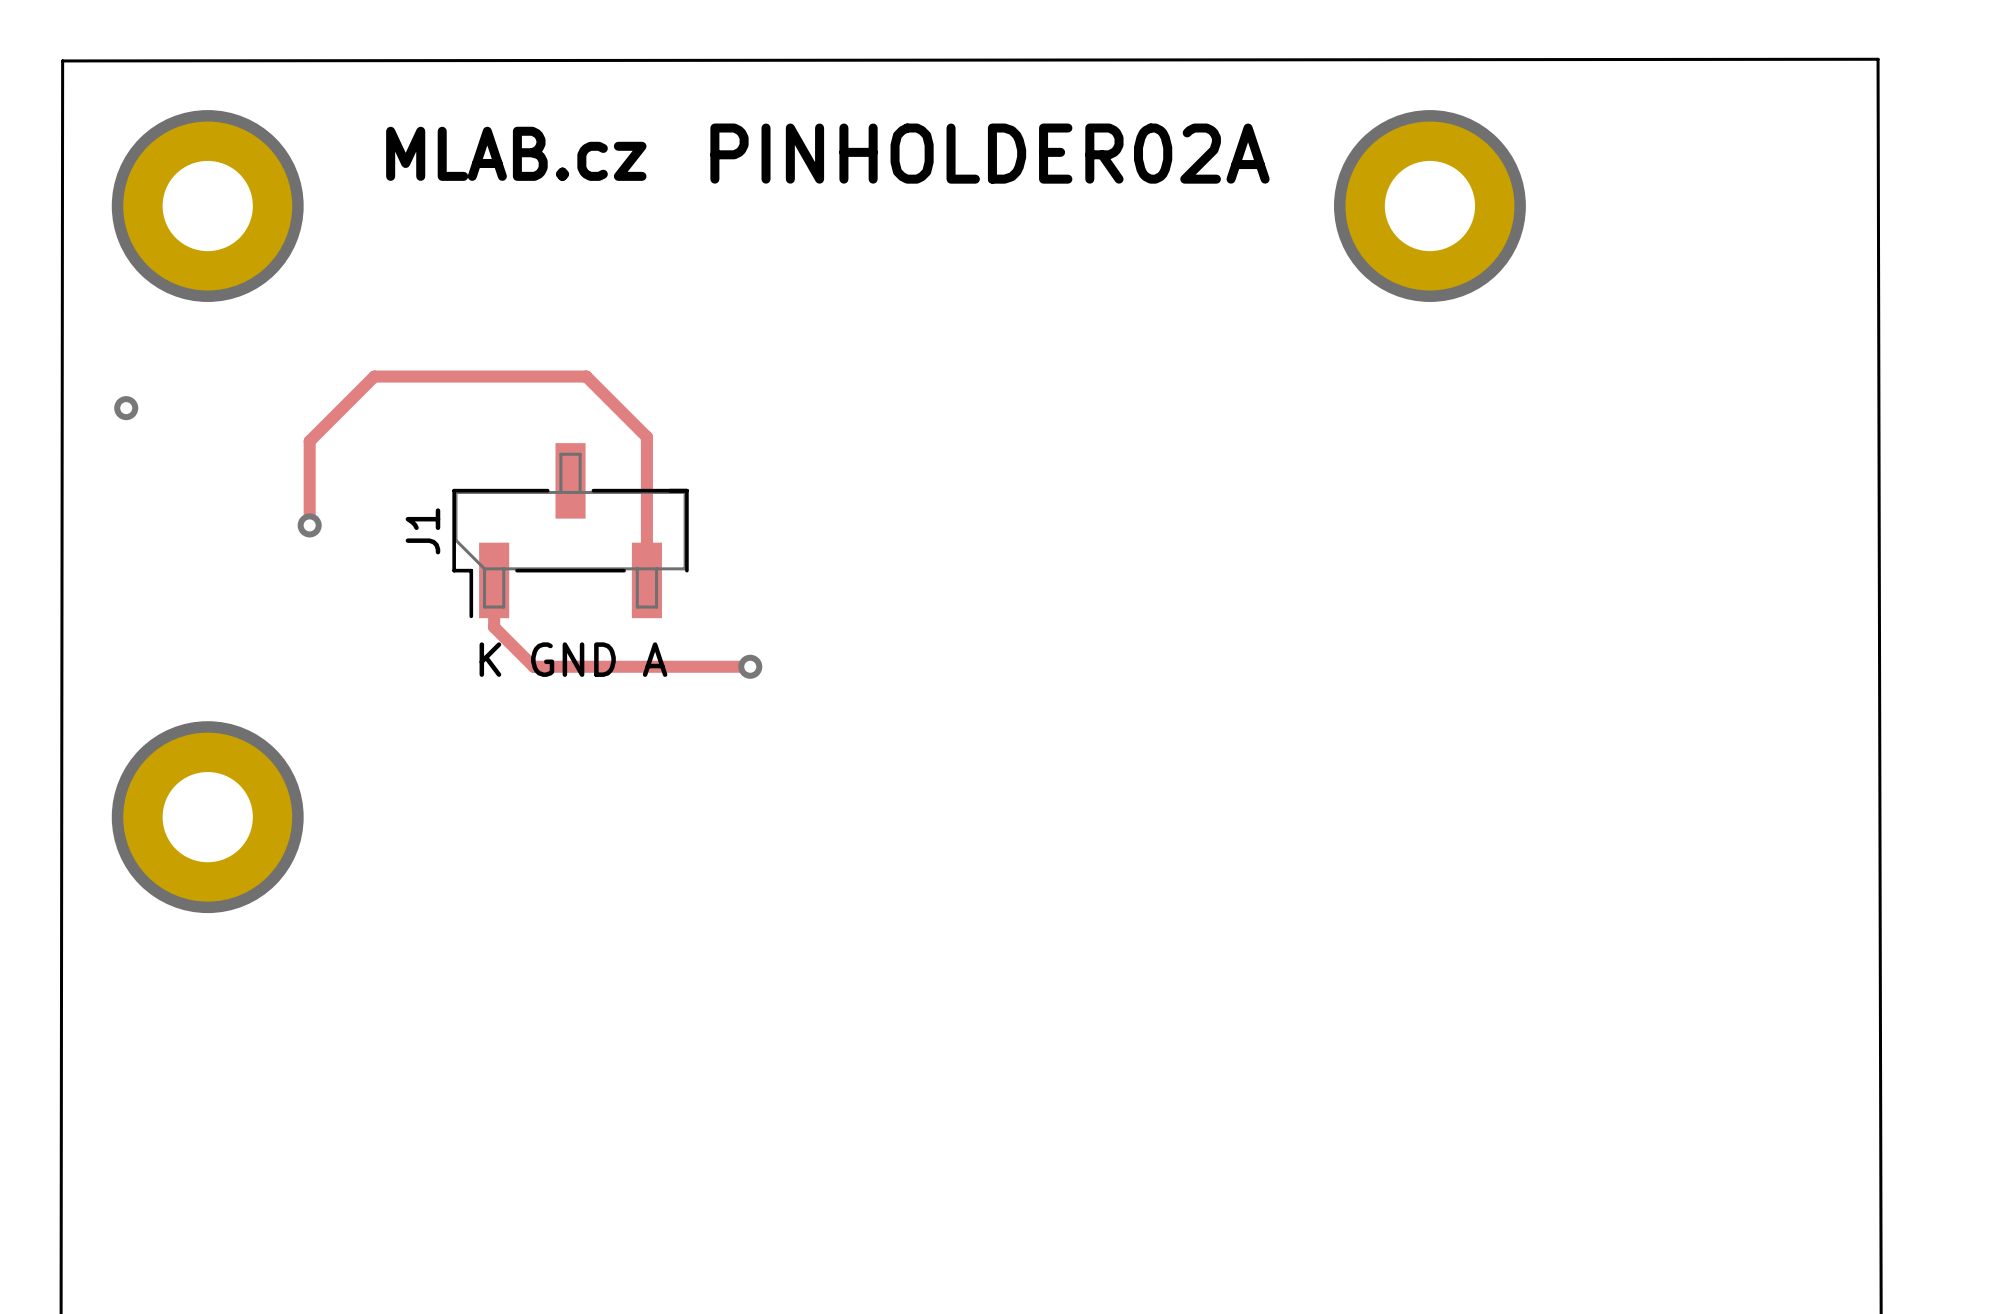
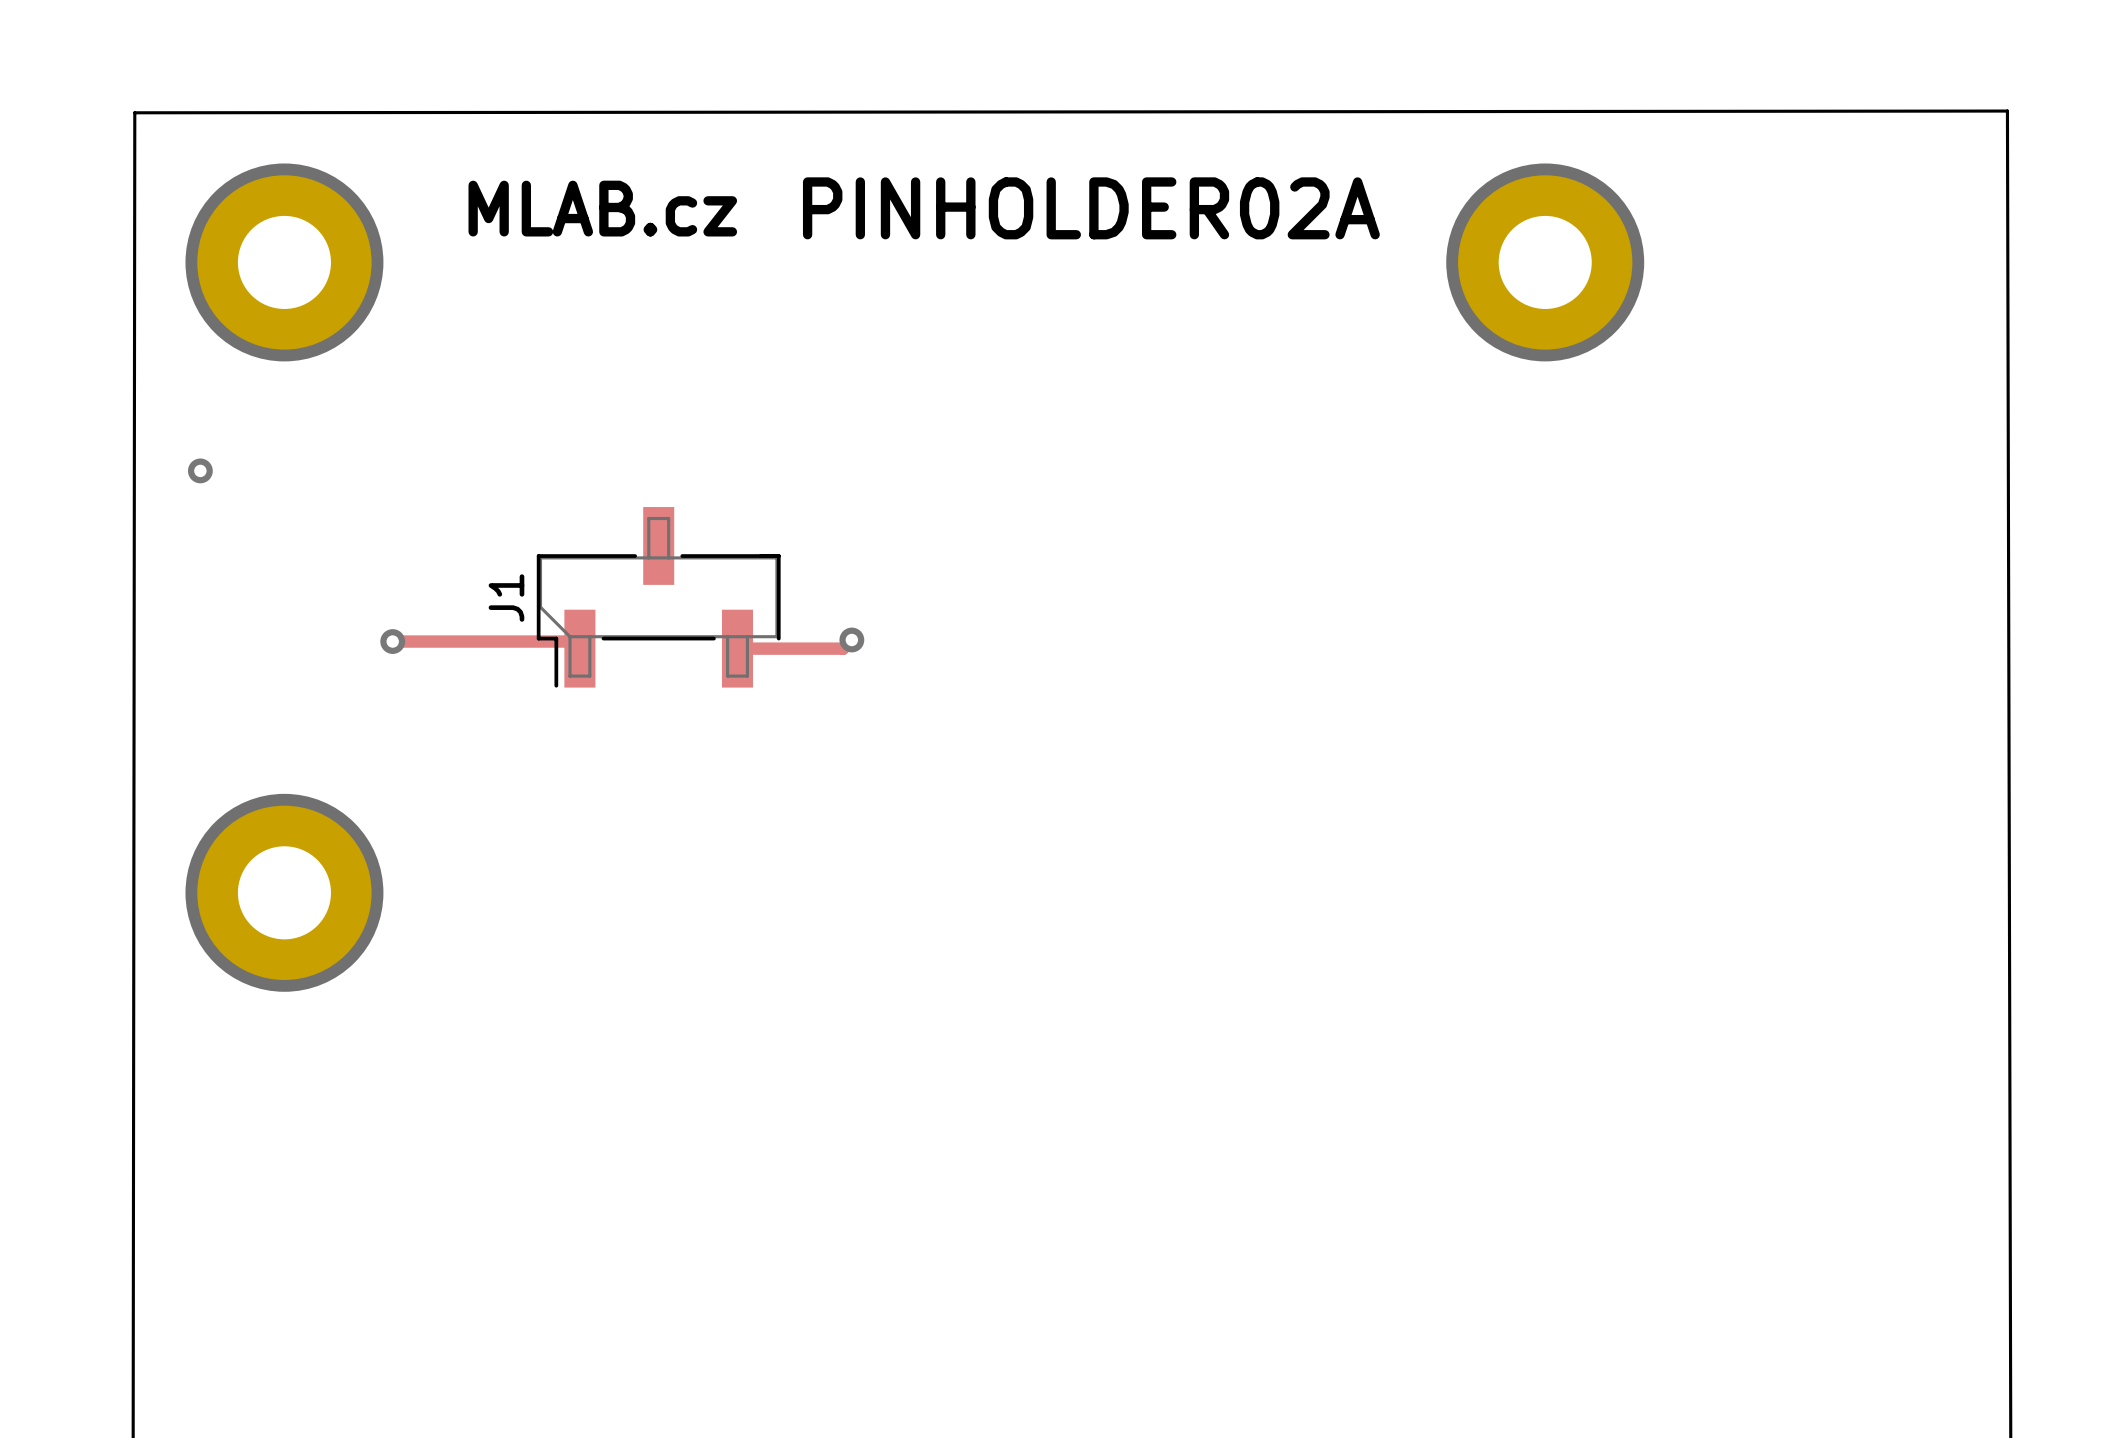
track: (309, 525) (309, 441) (374, 376) (586, 376) (646, 437) (646, 580) -> (851, 639) (843, 648) (737, 648)
via position: (309, 525) -> (392, 641)
track: none -> (392, 641) (572, 641)
track: (494, 580) (494, 627) (533, 666) (750, 666) -> none
text: K GND A (573, 659) -> none
via position: (750, 666) -> (851, 639)

